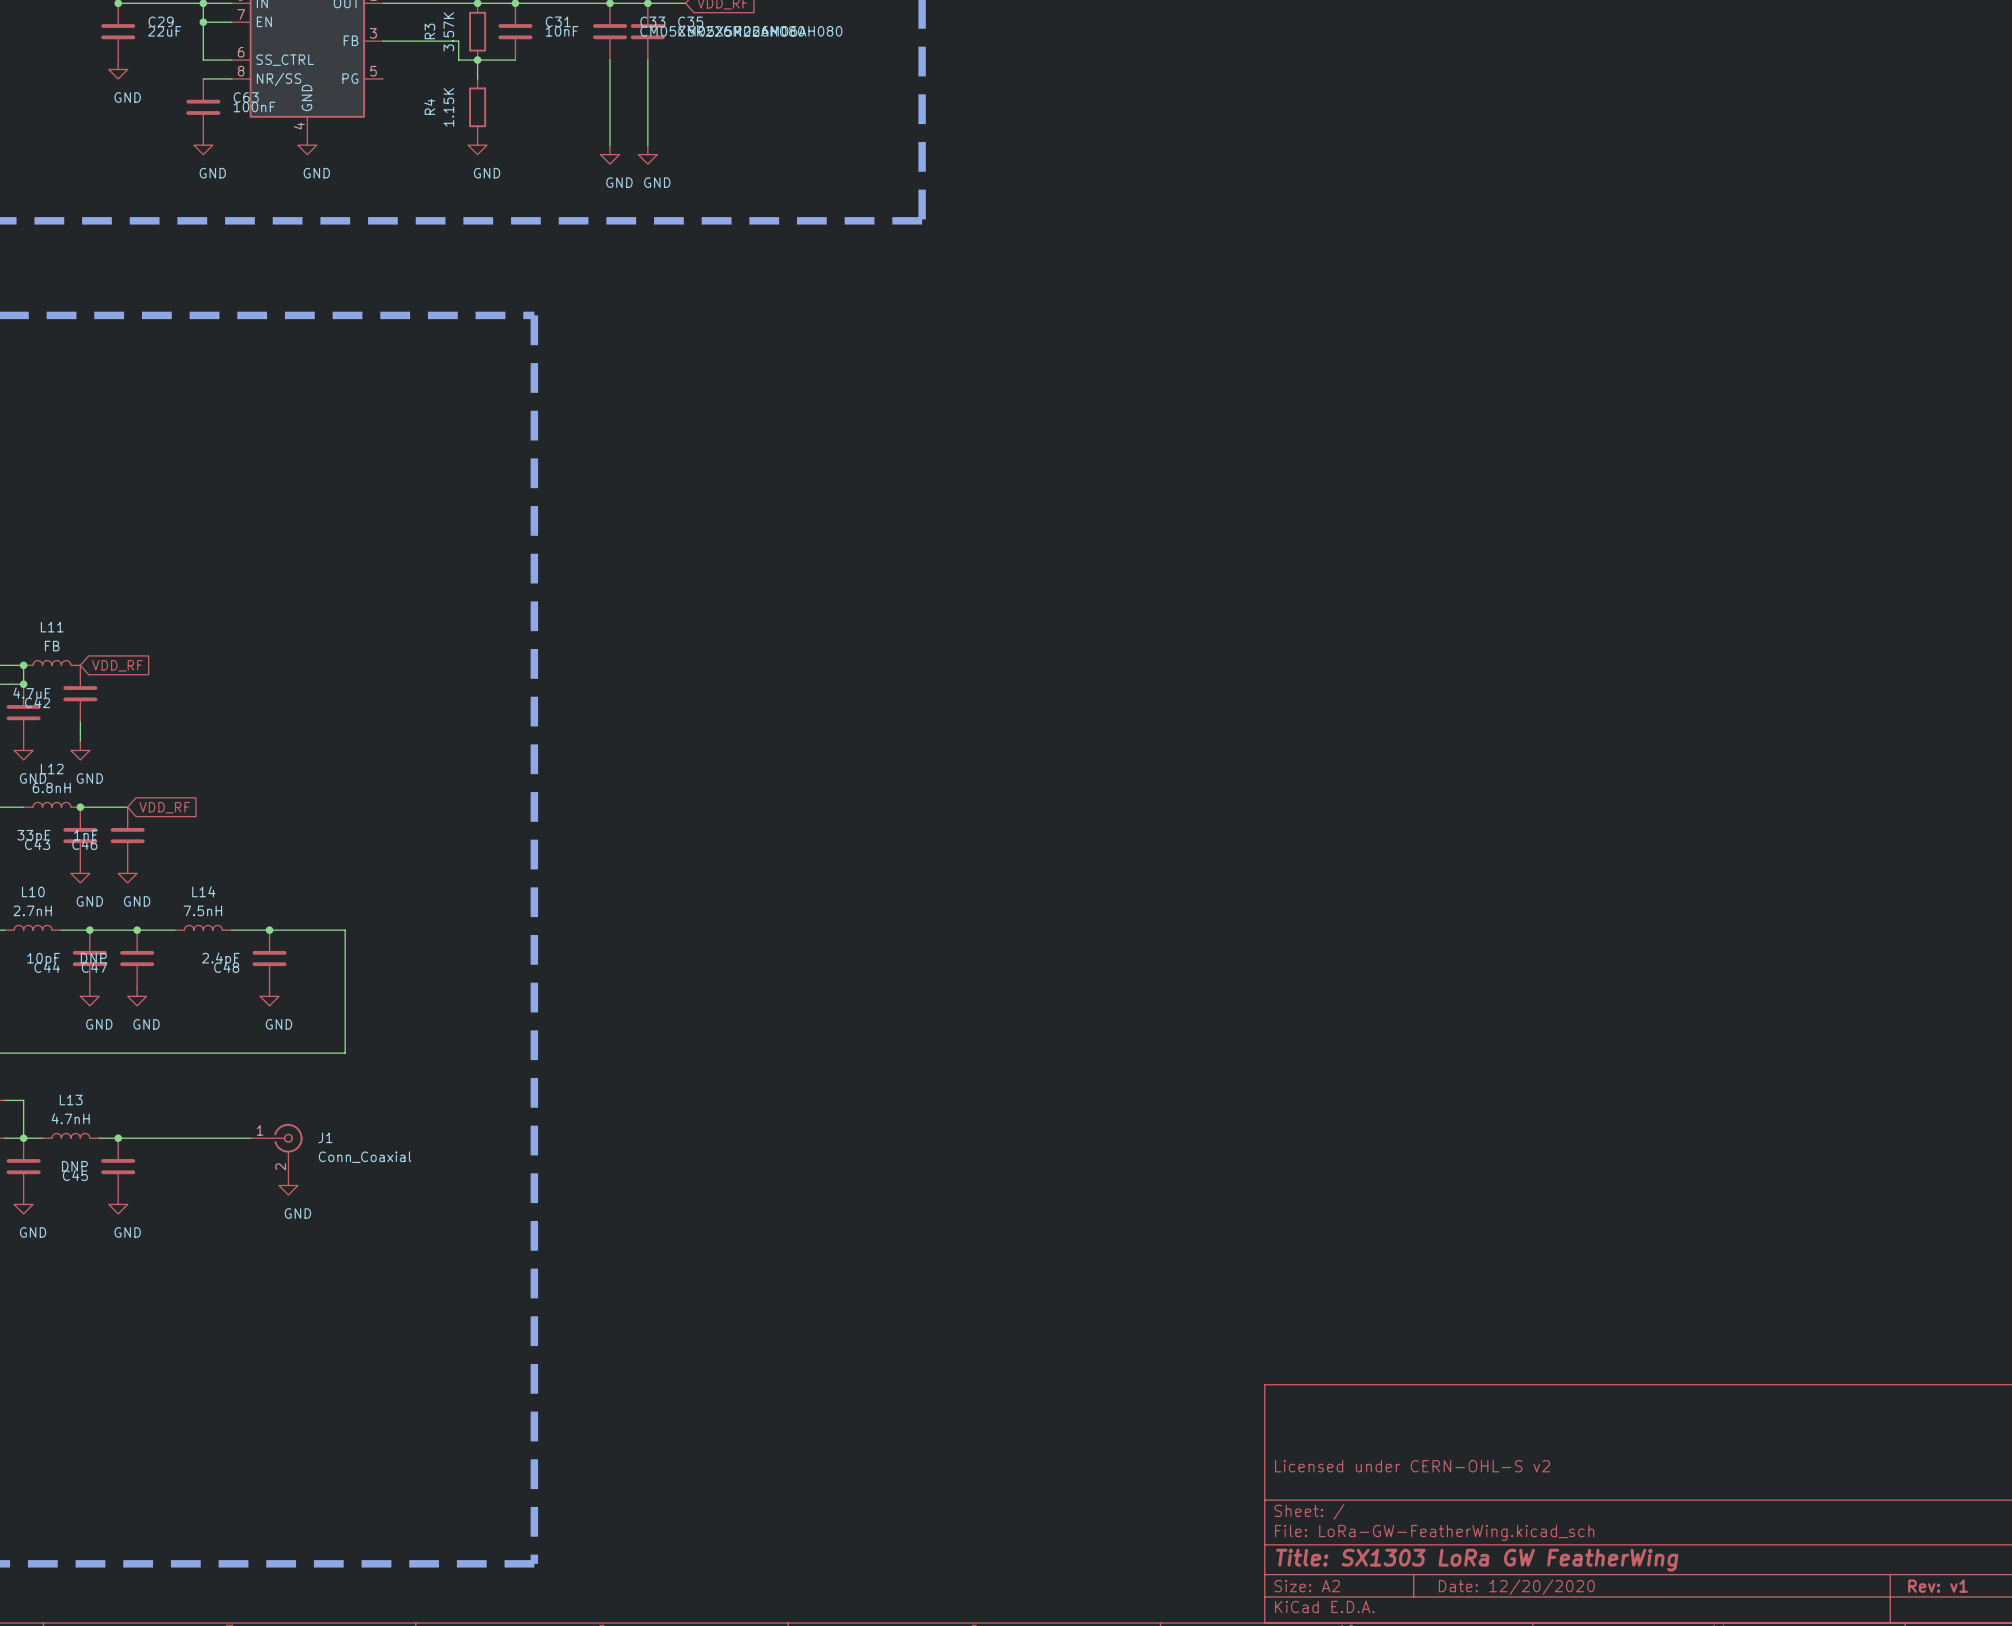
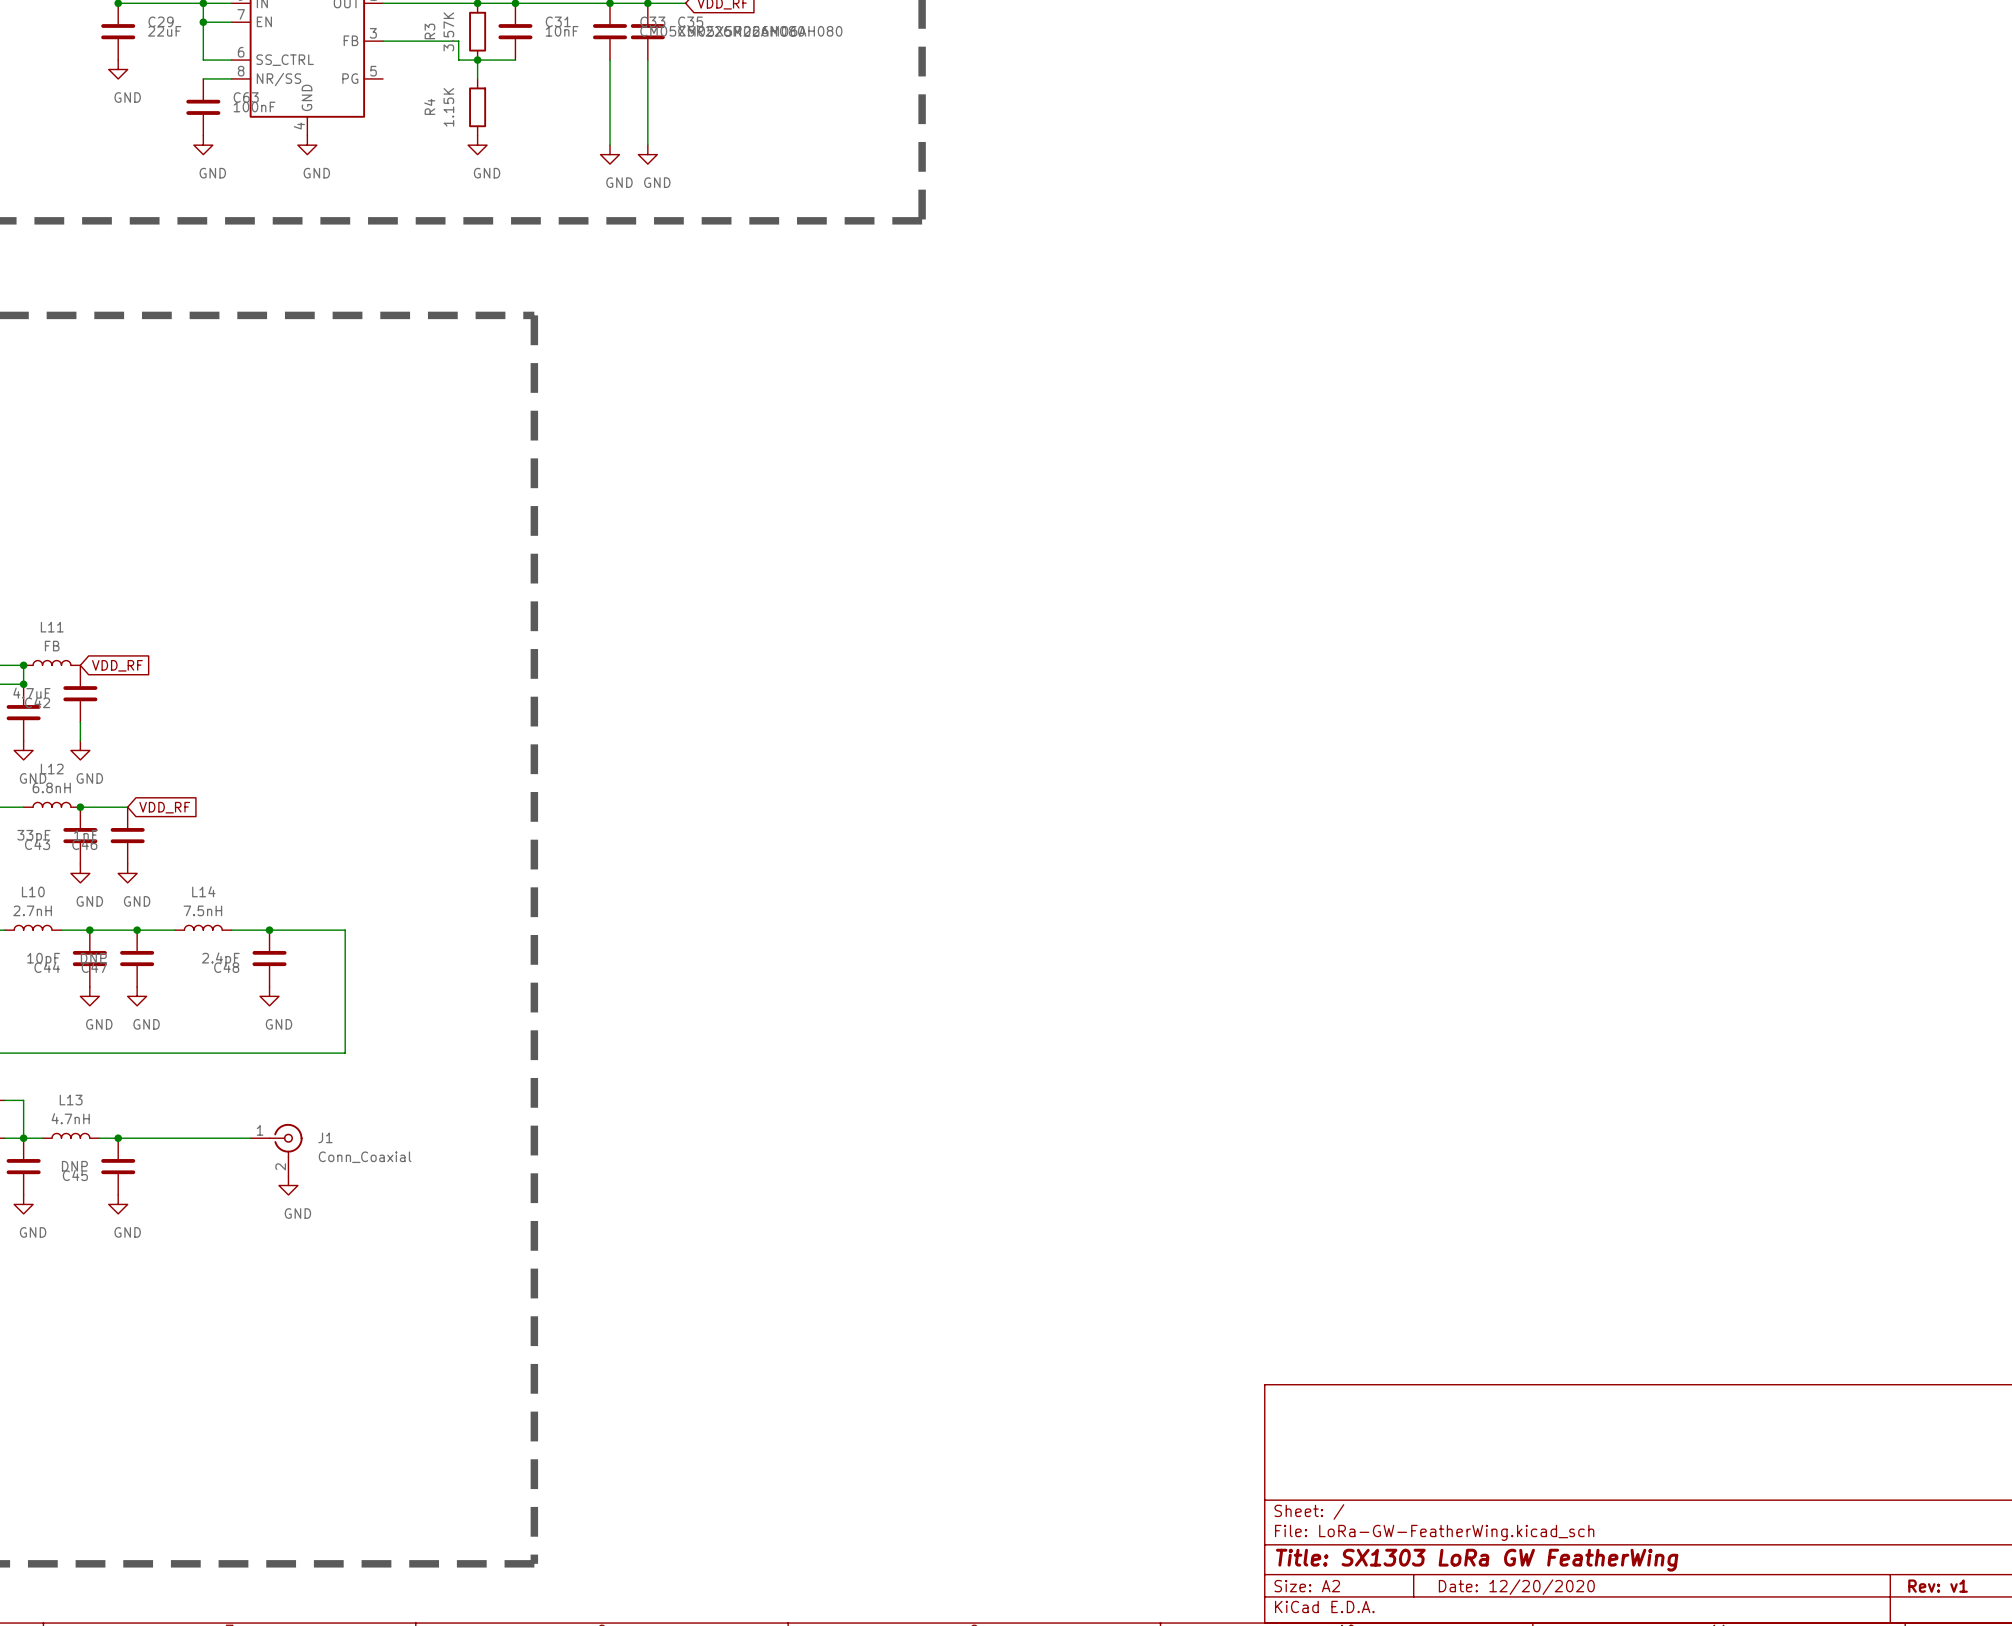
title block: Licensed under CERN-OHL-S v2 (1412, 1466) -> none

